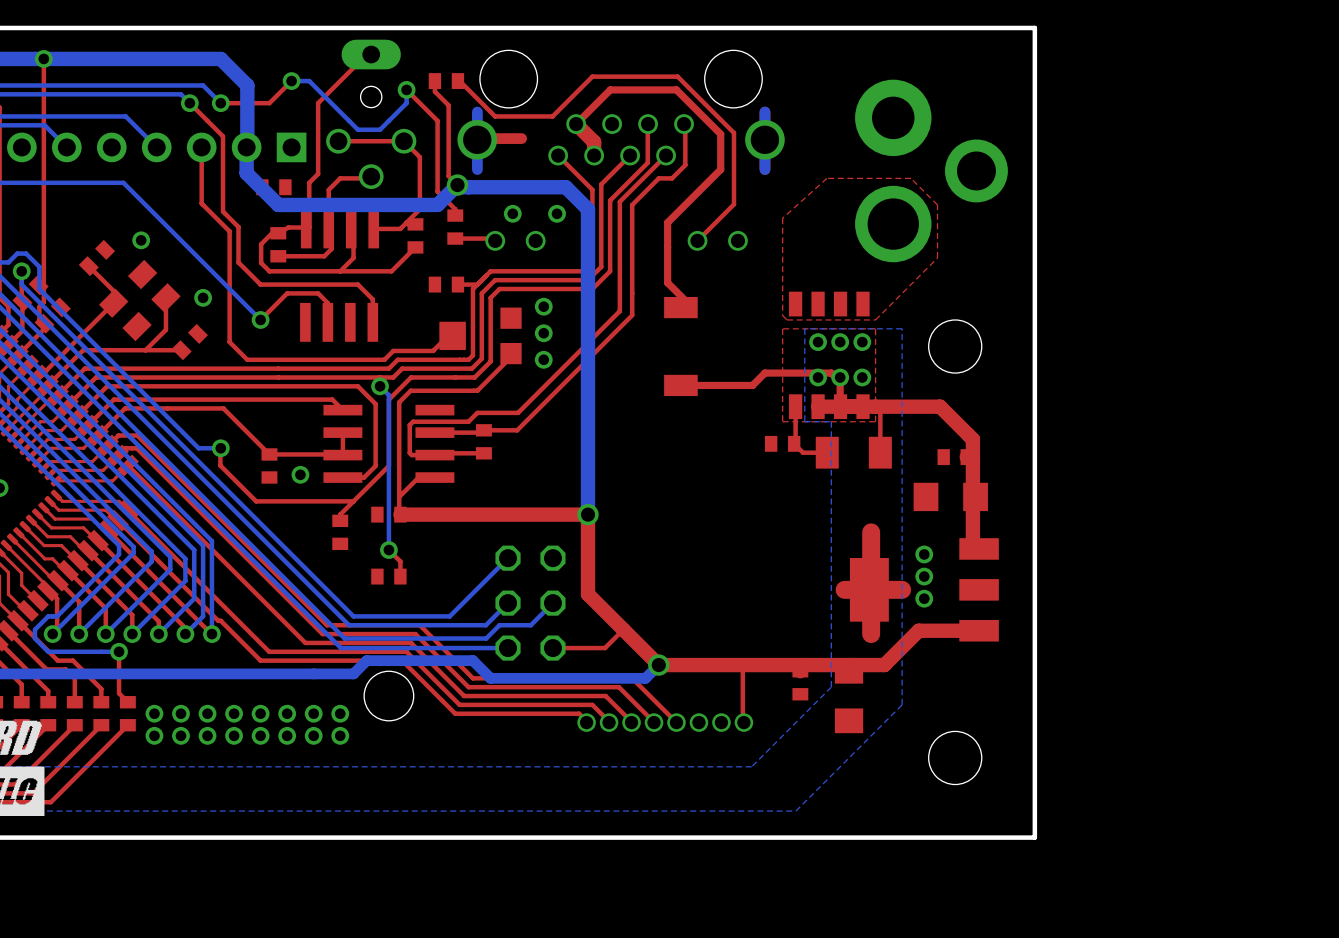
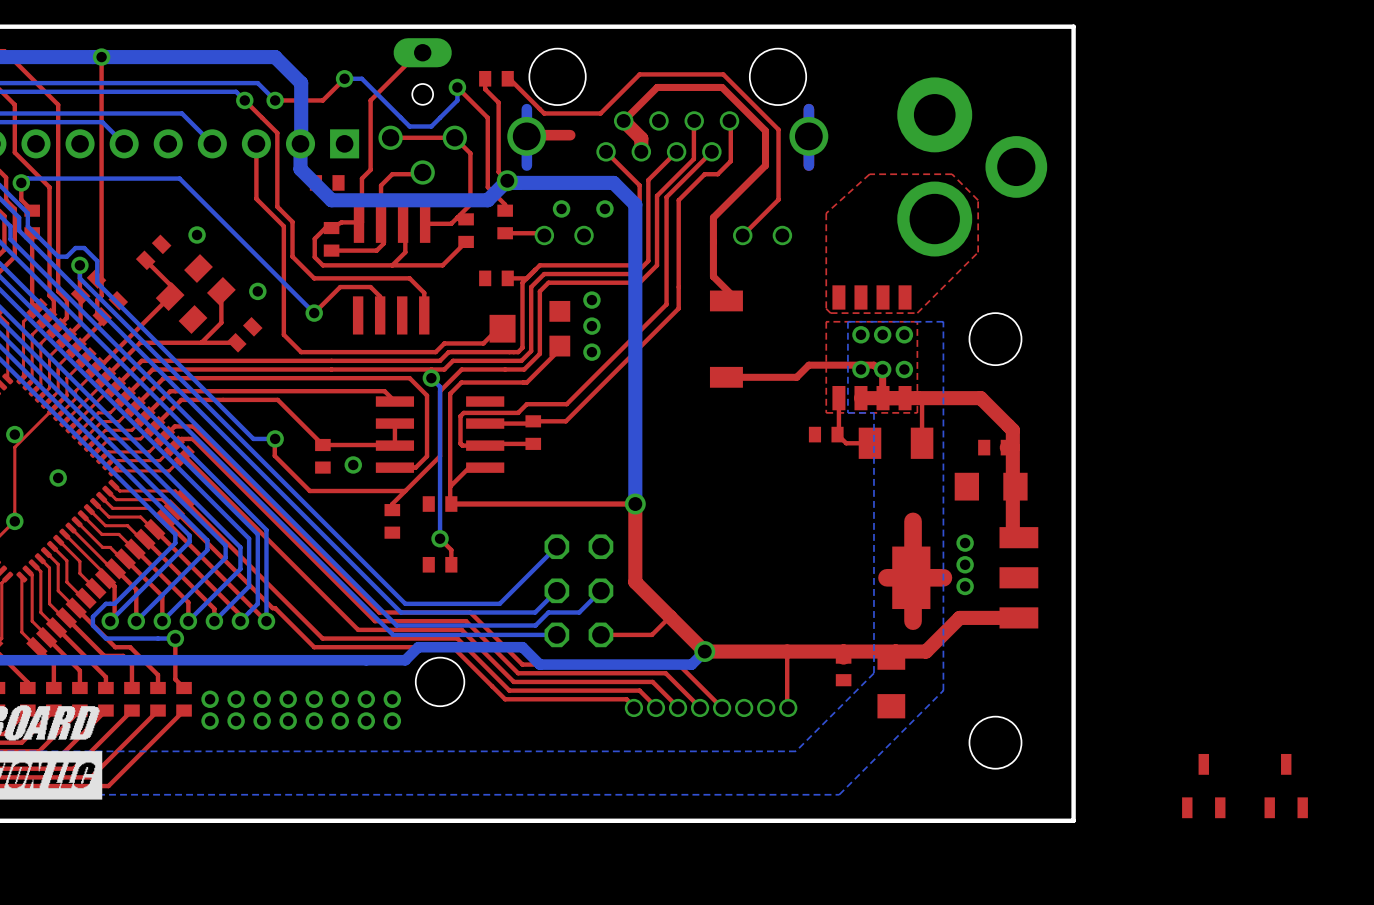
top track width: thick (588, 514) (400, 514) -> thin (635, 504) (451, 504)
part: none -> (1203, 786)
part: none -> (1286, 786)

